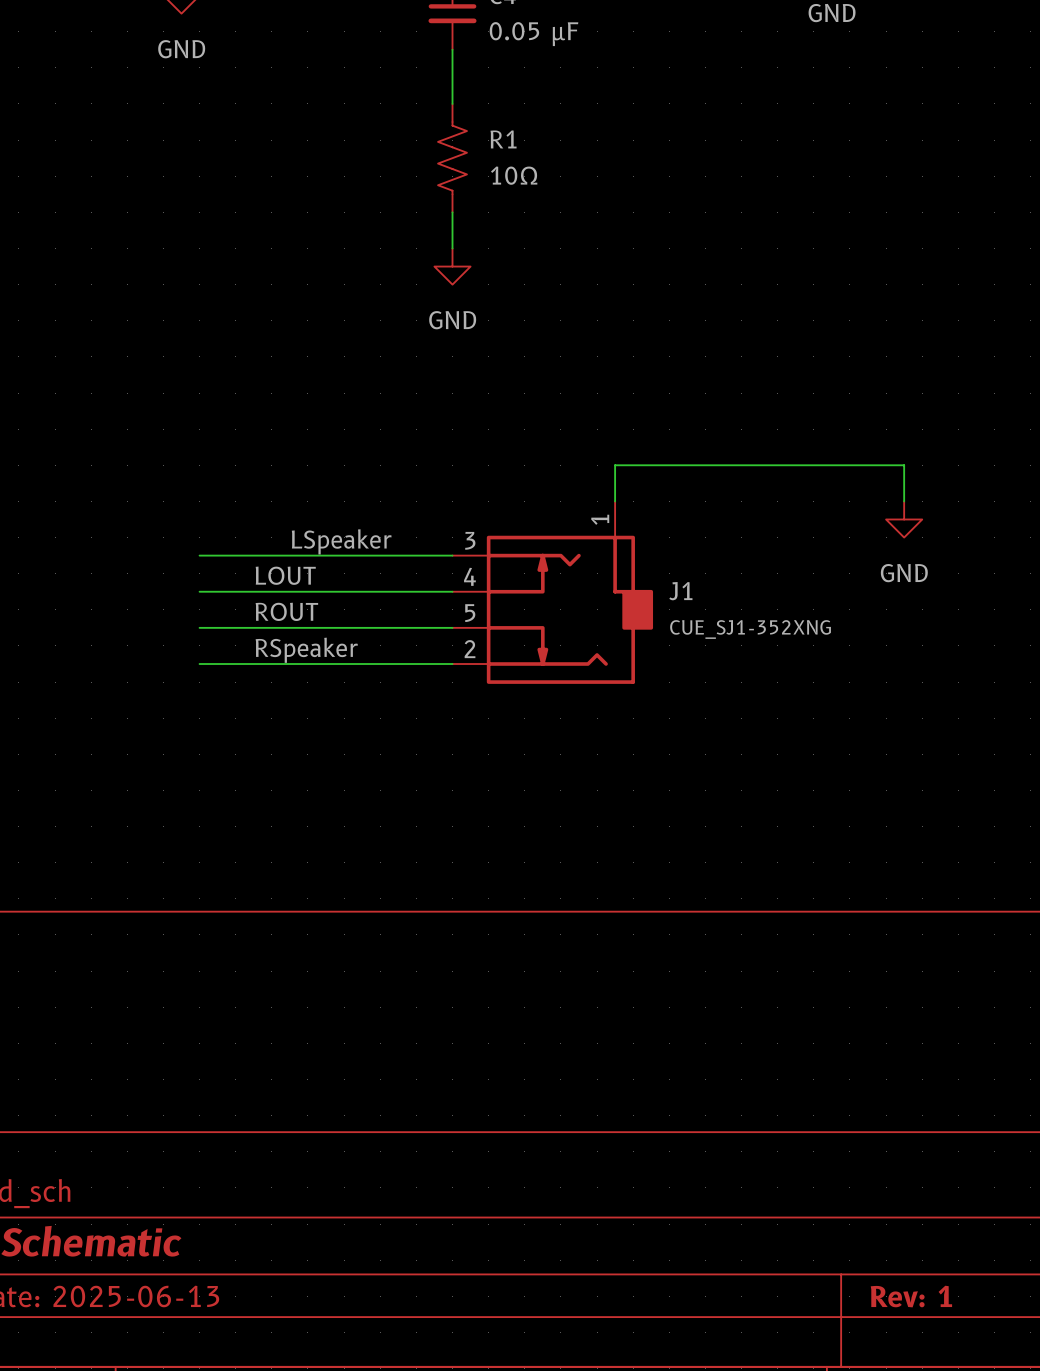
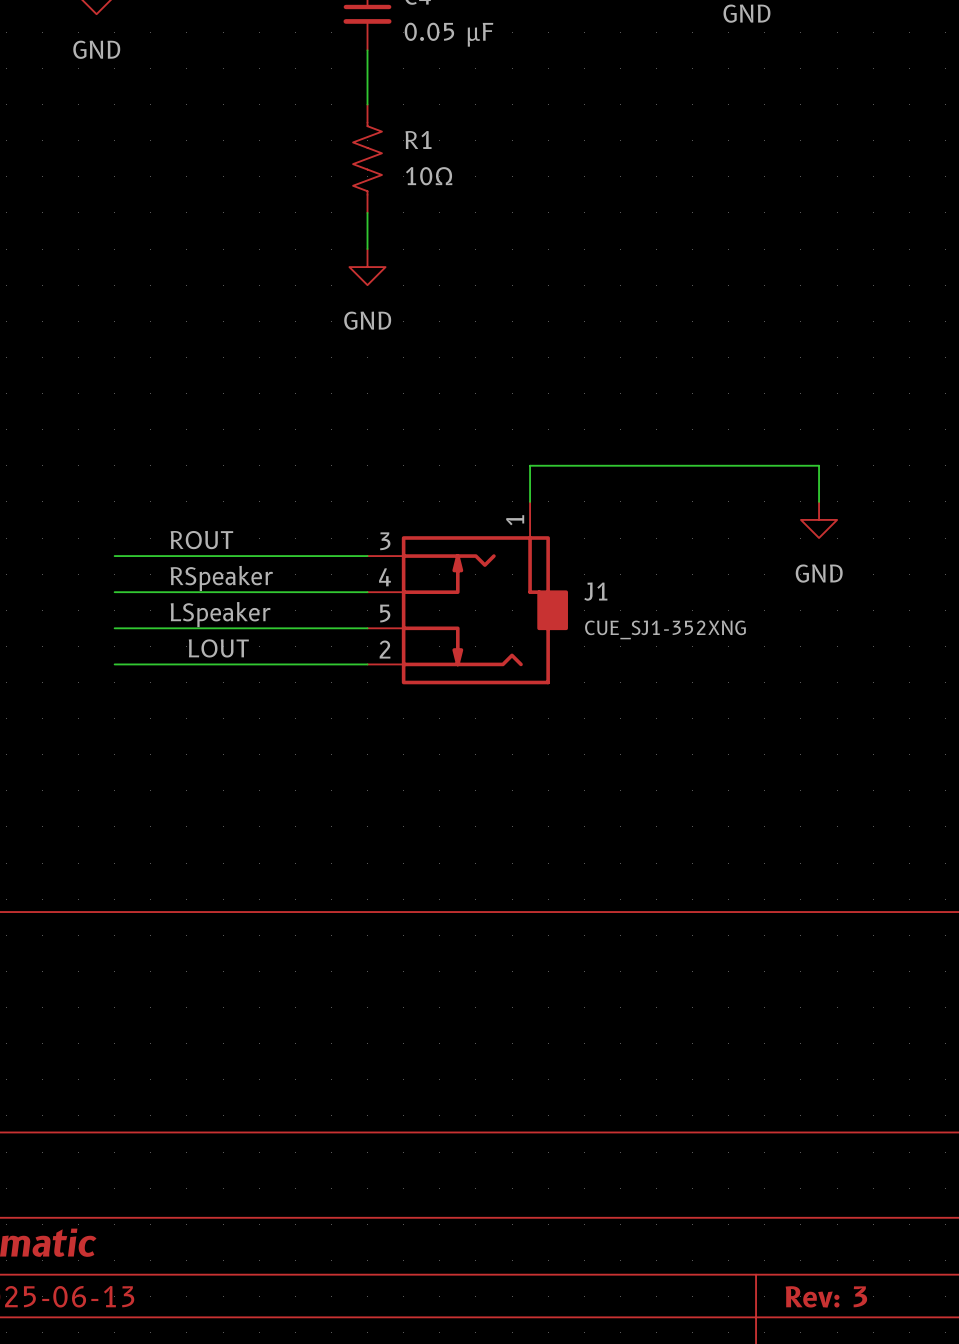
label: none -> ROUT (201, 540)
label: LSpeaker (341, 541) -> none
label: LOUT (285, 575) -> RSpeaker (221, 578)
label: ROUT (286, 611) -> LSpeaker (220, 614)
label: none -> LOUT (218, 648)
label: RSpeaker (306, 650) -> none
title block: Rev: 1 (911, 1296) -> Rev: 3 (826, 1296)

